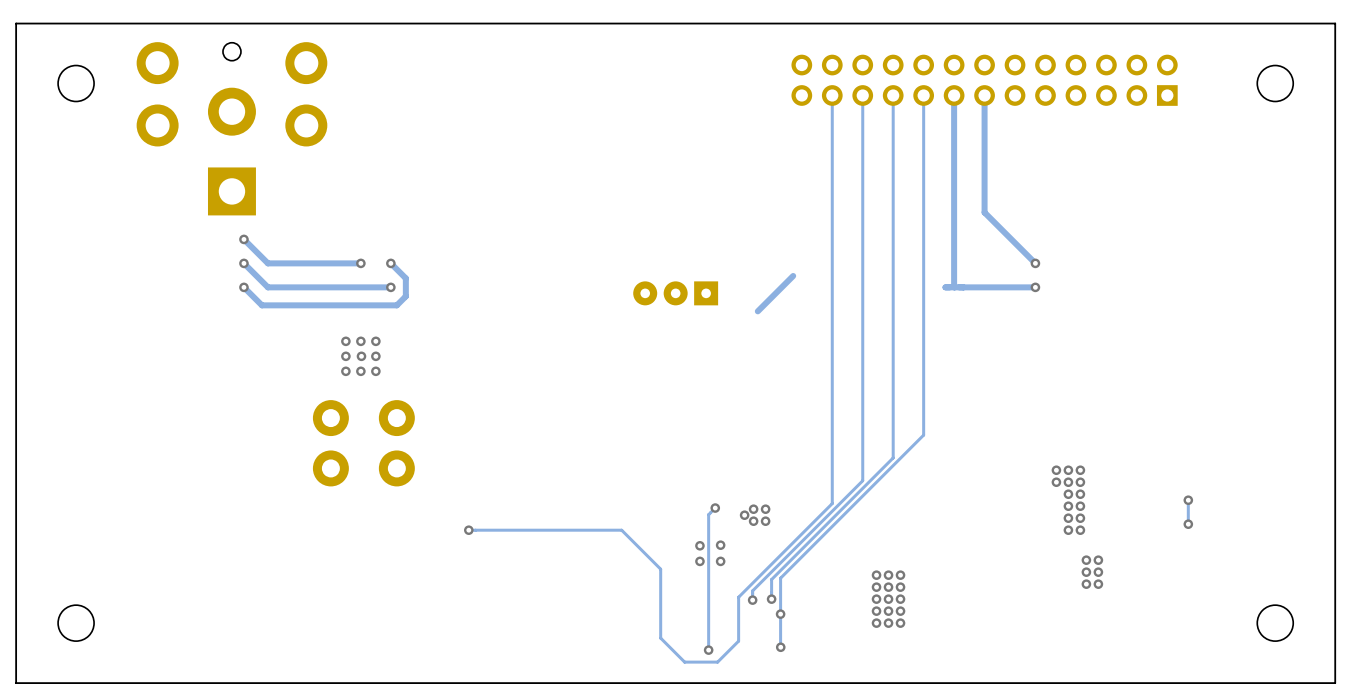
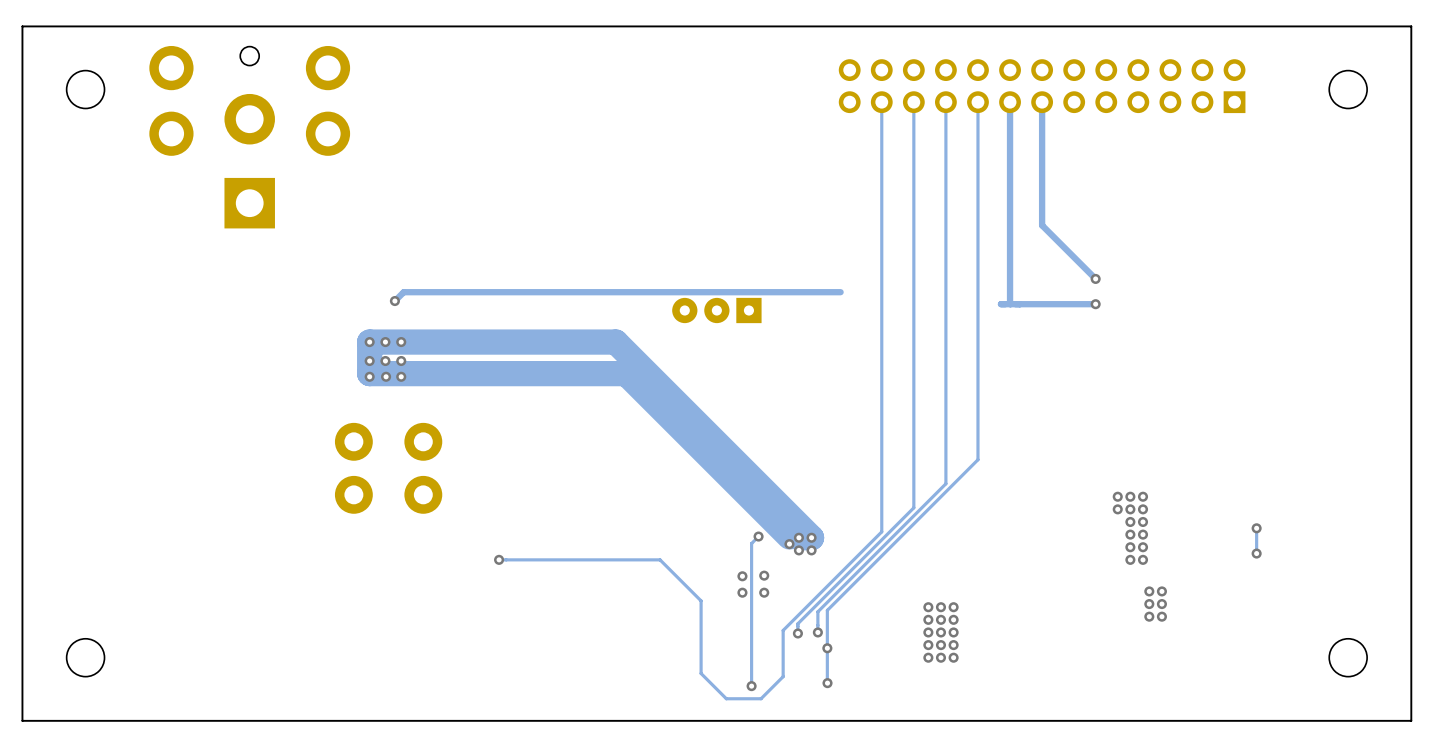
track: (243, 239) (267, 263) (360, 263) -> none
via: (243, 239) -> none
track: (243, 263) (267, 287) (390, 287) -> none
via: (243, 263) -> none
via: (360, 263) -> none
track: (390, 263) (405, 278) (405, 296) (396, 305) (261, 305) (243, 287) -> none
via: (390, 263) -> none
track: (793, 275) (757, 311) -> (840, 292) (403, 292) (394, 301)
via: none -> (394, 301)
via: (243, 287) -> none
via: (390, 287) -> none
via: none -> (369, 342)
via: none -> (385, 342)
via: none -> (401, 342)
via: (345, 371) -> none
via: (360, 371) -> none
via: (375, 371) -> none
track: none -> (789, 536) (626, 373) (369, 373) (369, 342) (615, 342) (811, 537) (798, 537)

